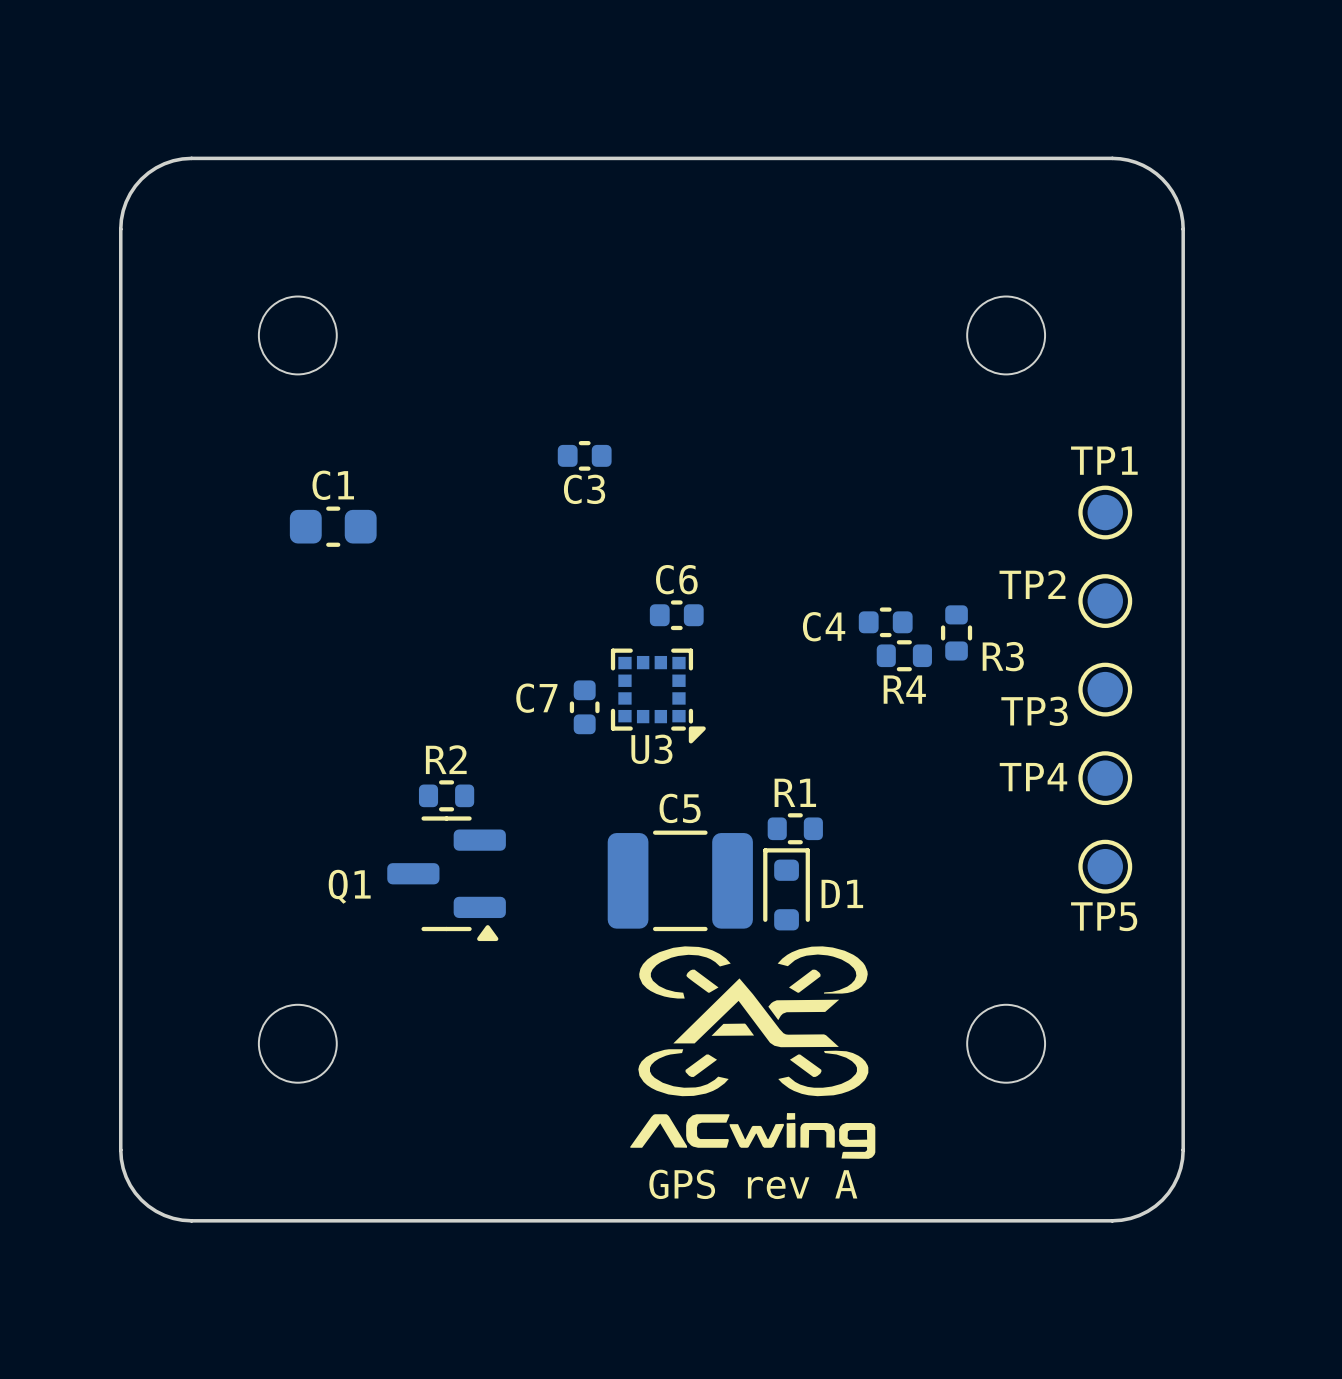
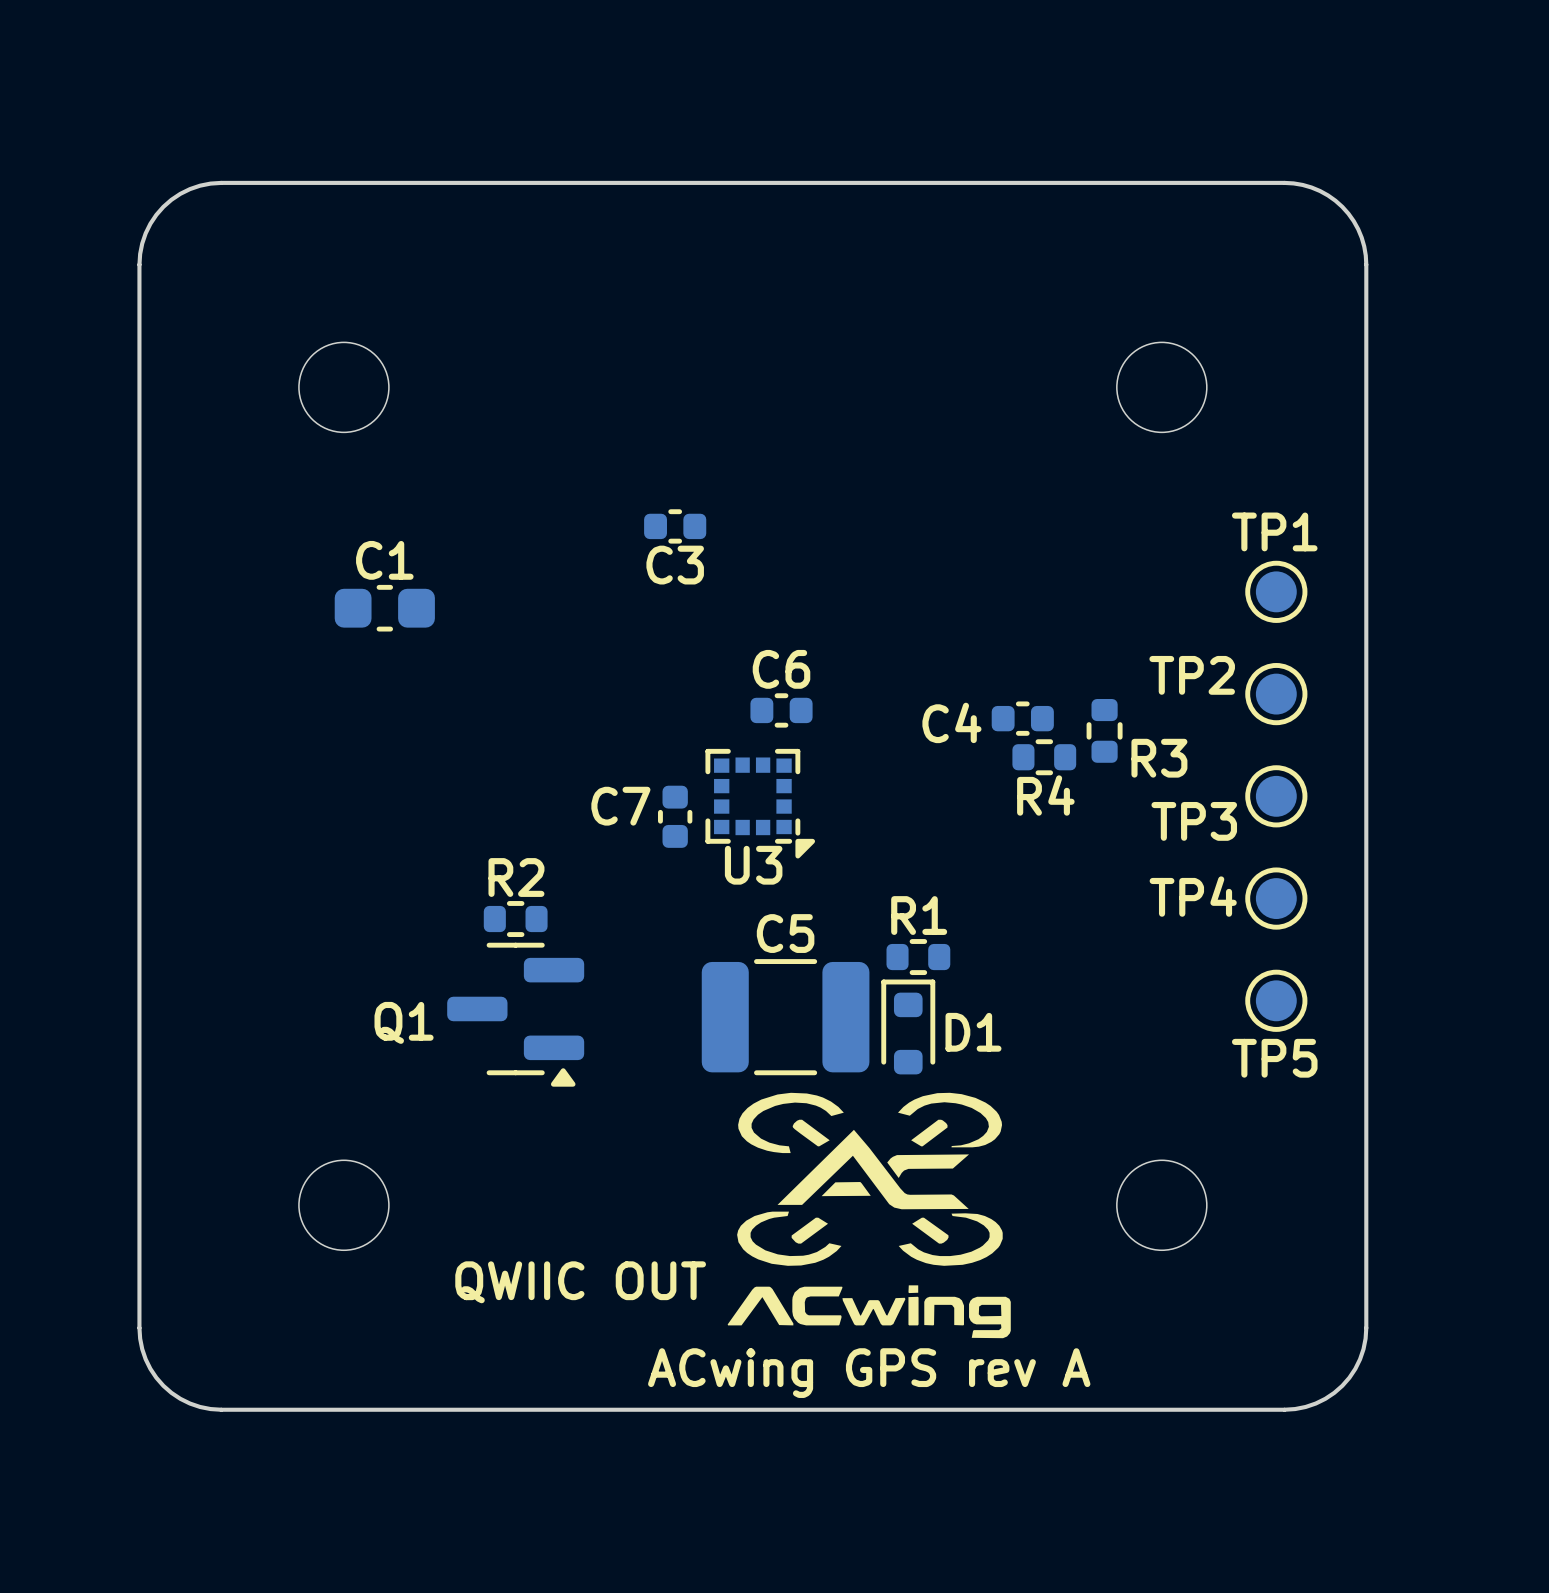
text: none -> QWIIC OUT (580, 1282)
text: GPS rev A (753, 1184) -> ACwing GPS rev A (869, 1373)

